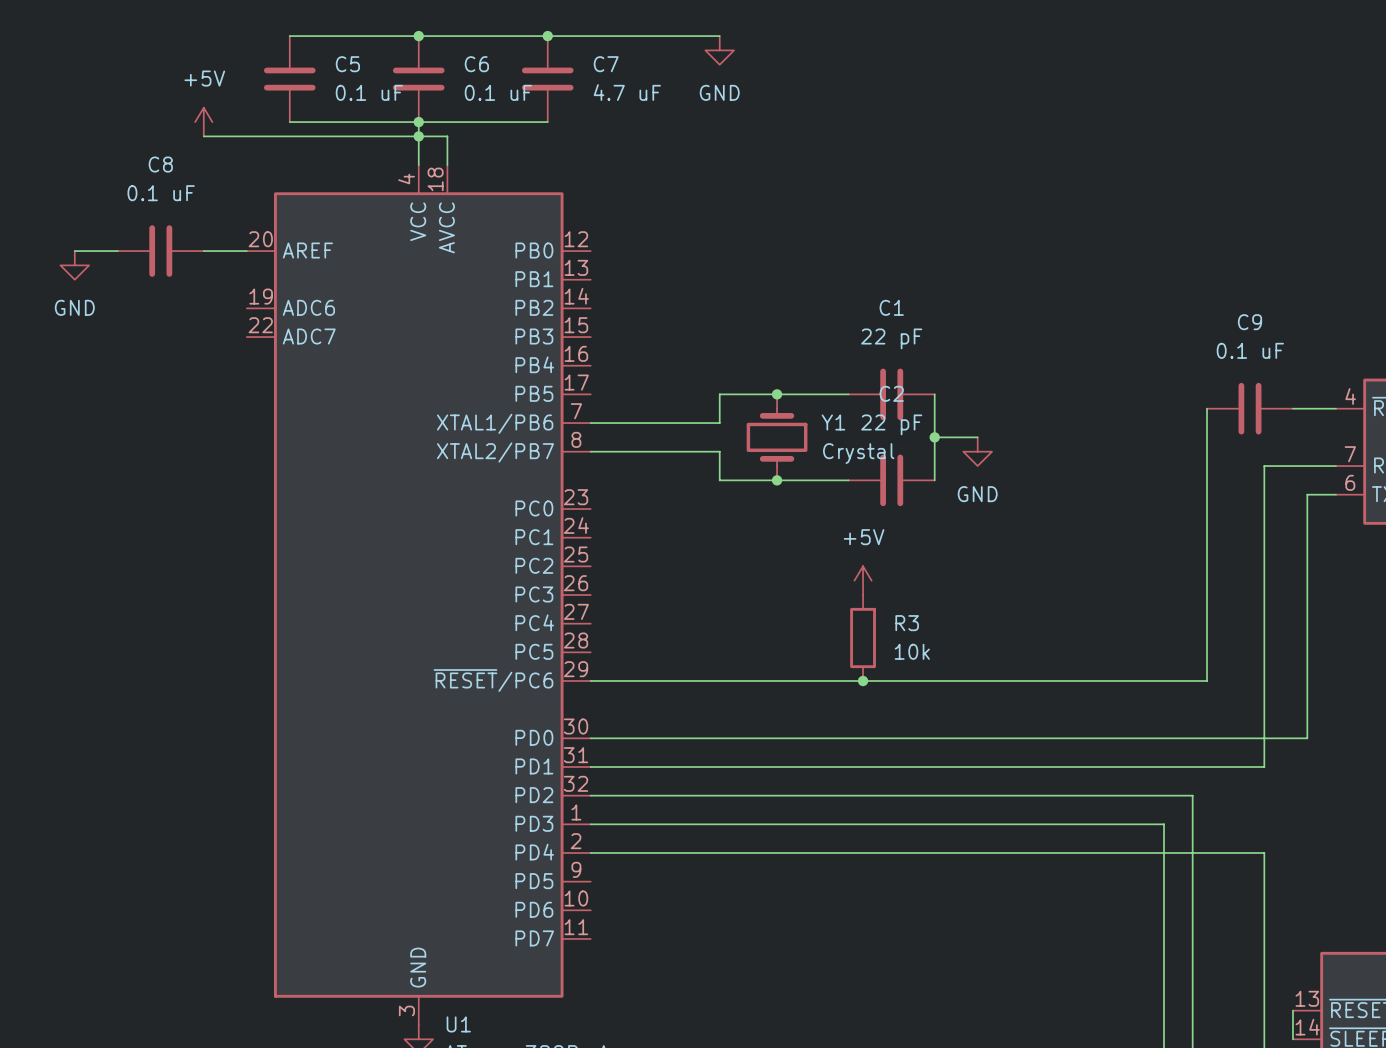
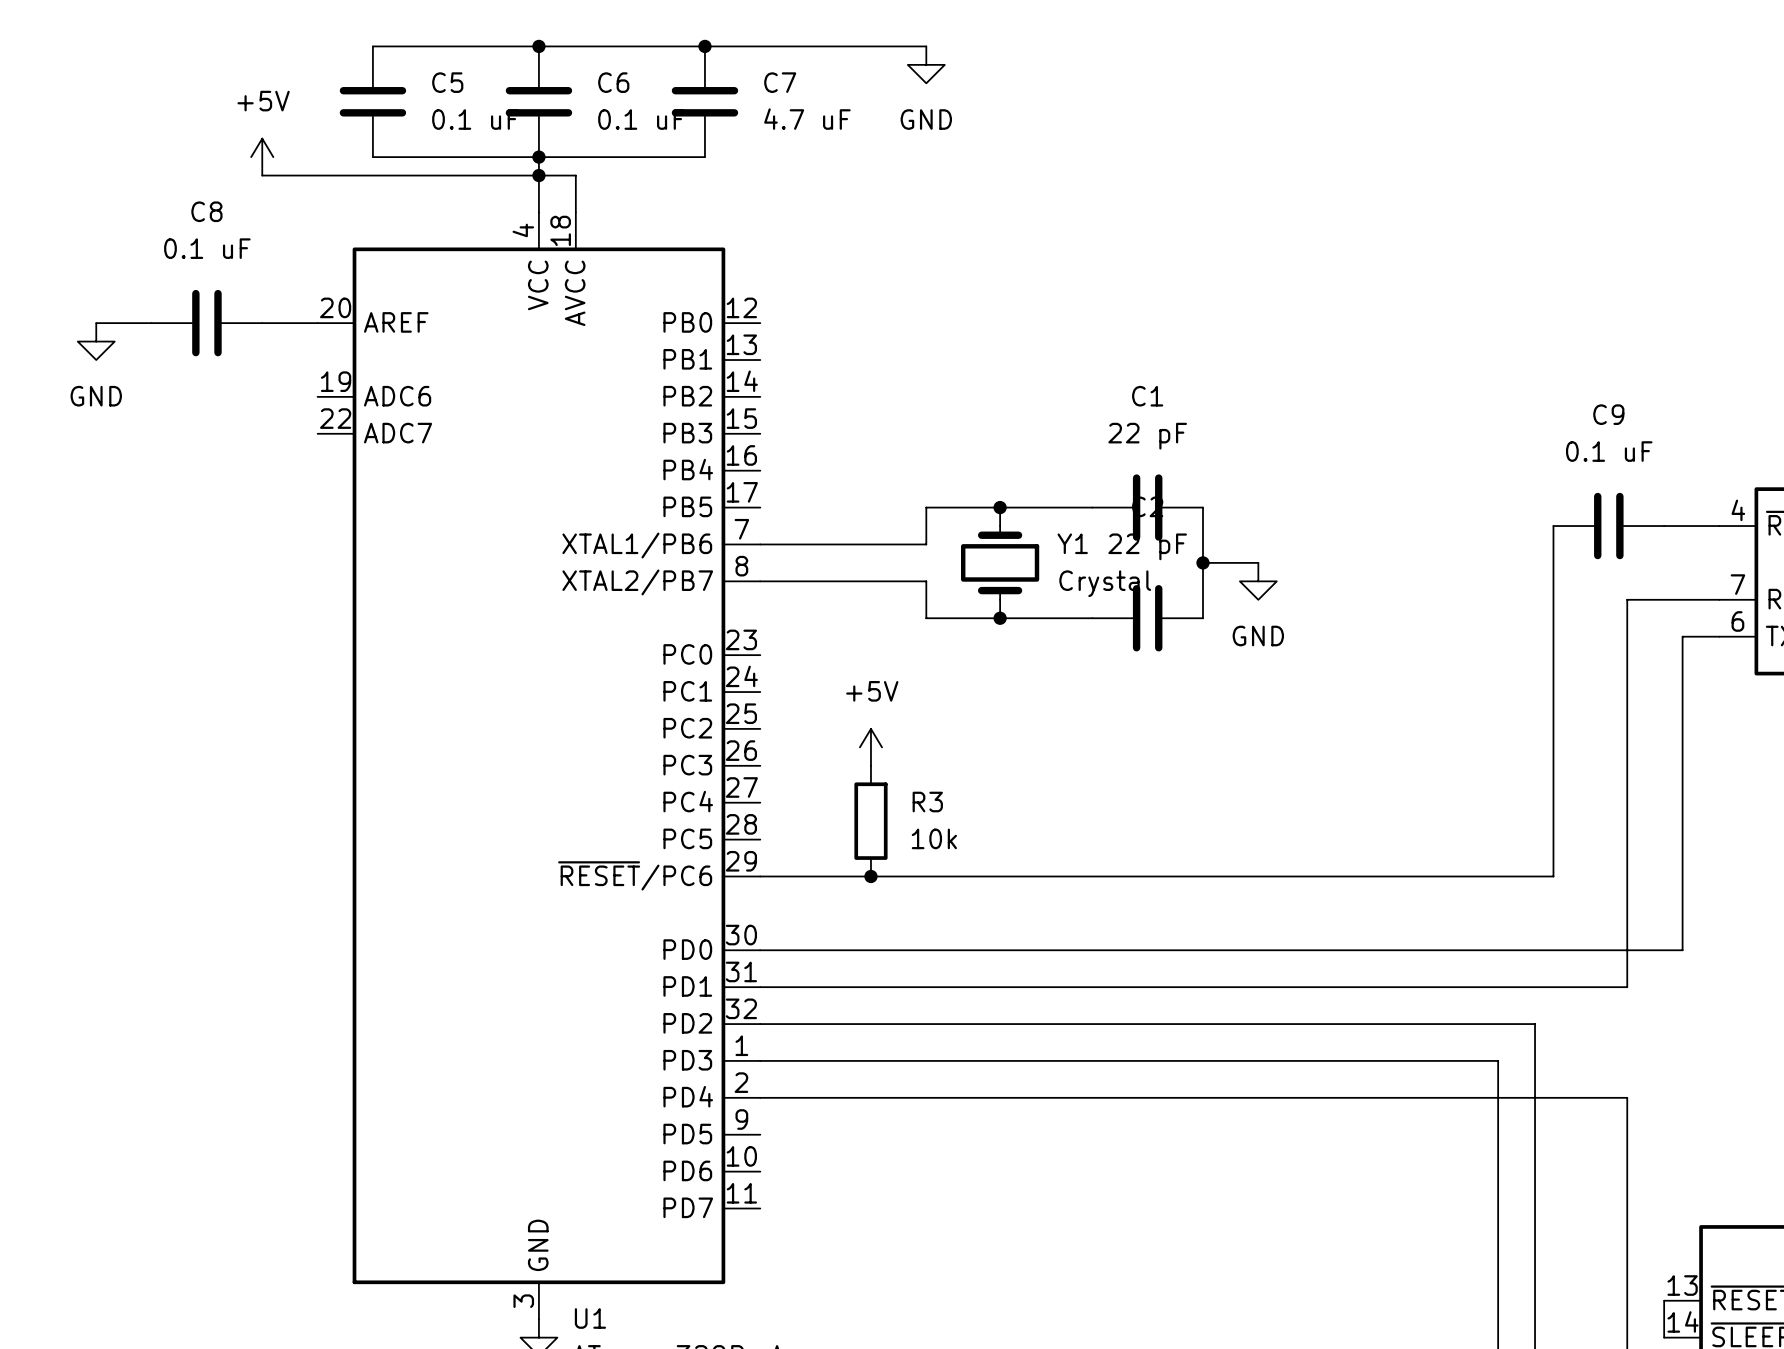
power symbol position: +5V (863, 580) -> +5V (870, 747)
R3 position: (863, 638) -> (870, 821)
junction: none -> (870, 876)
junction: (863, 681) -> none

